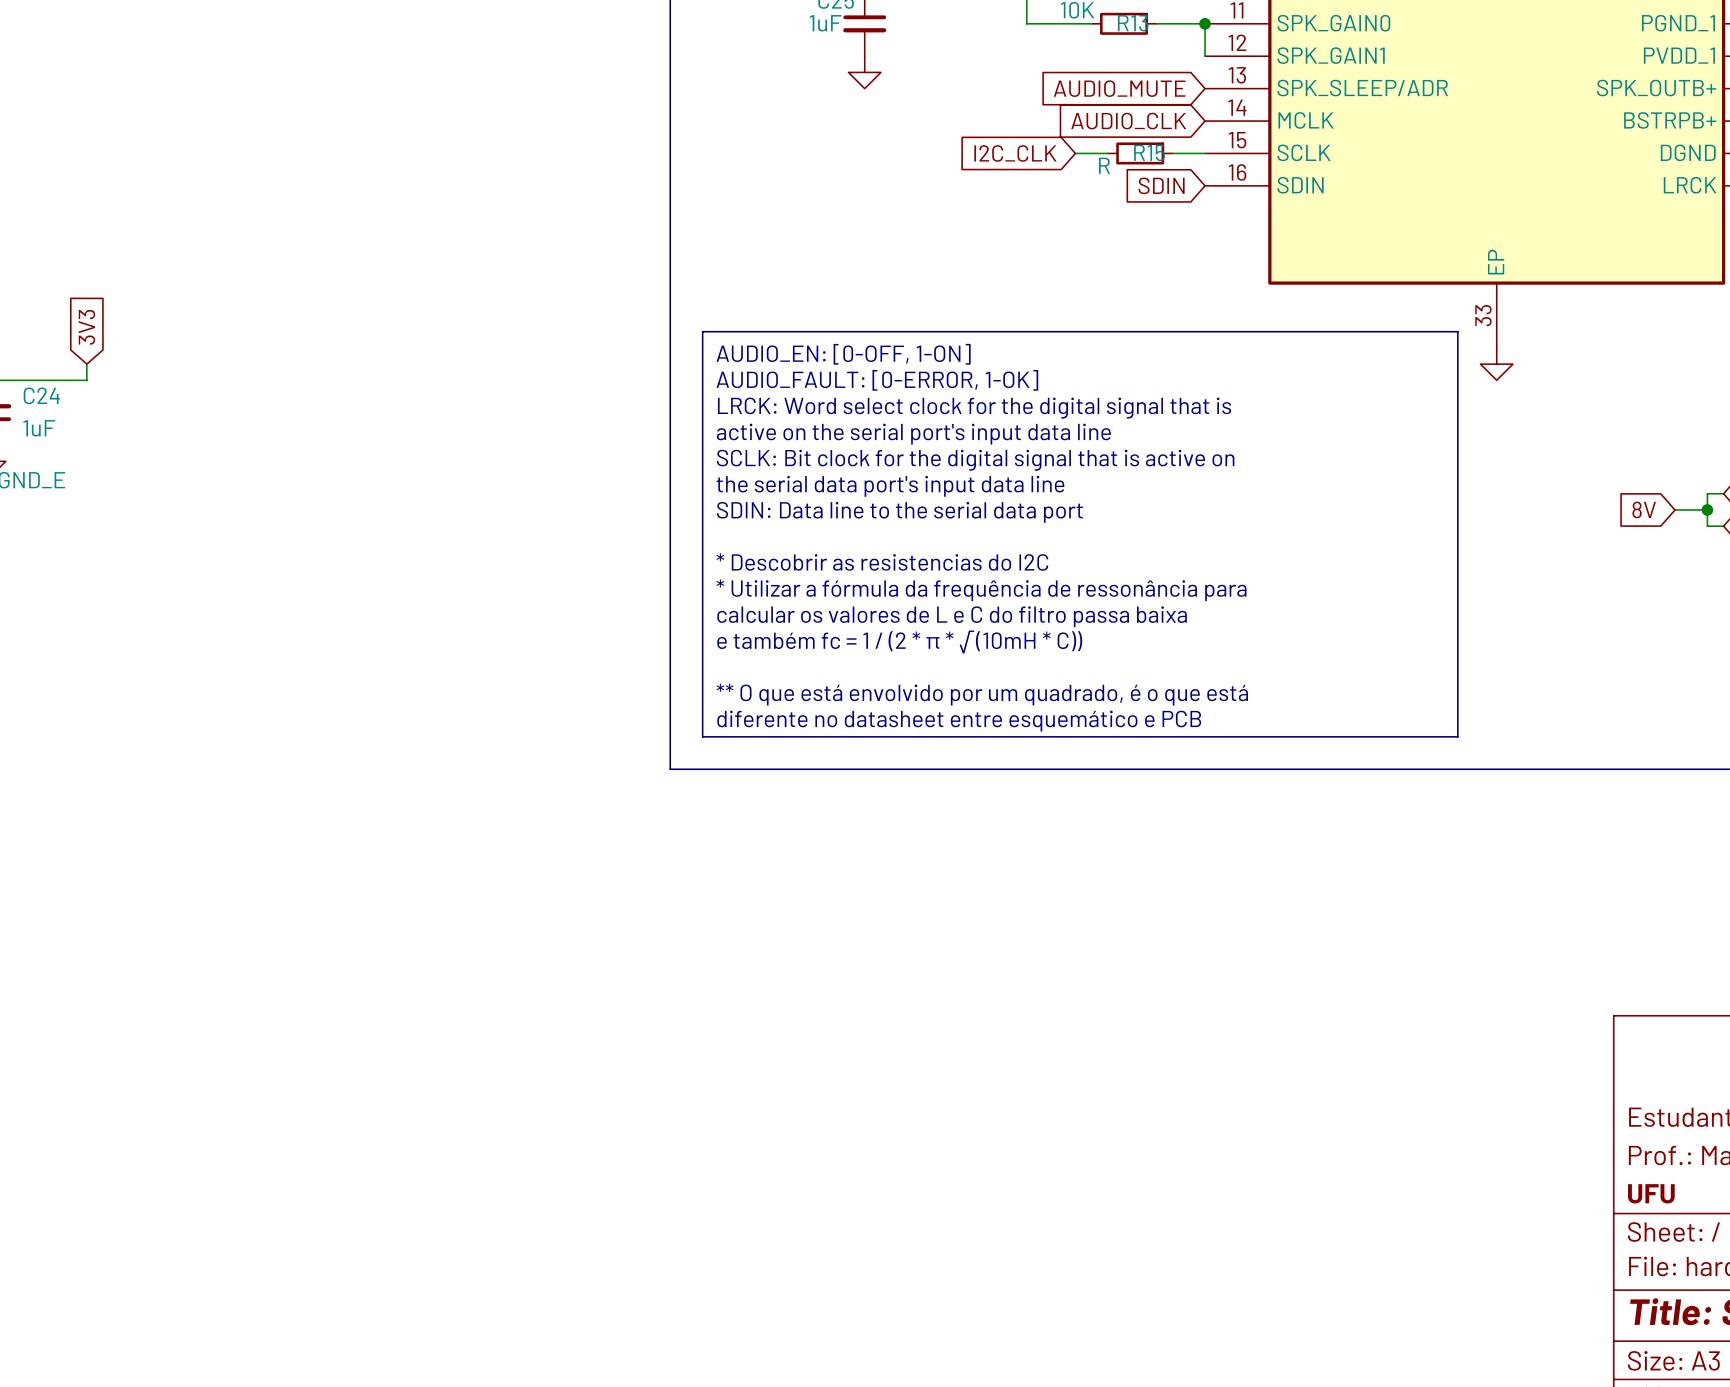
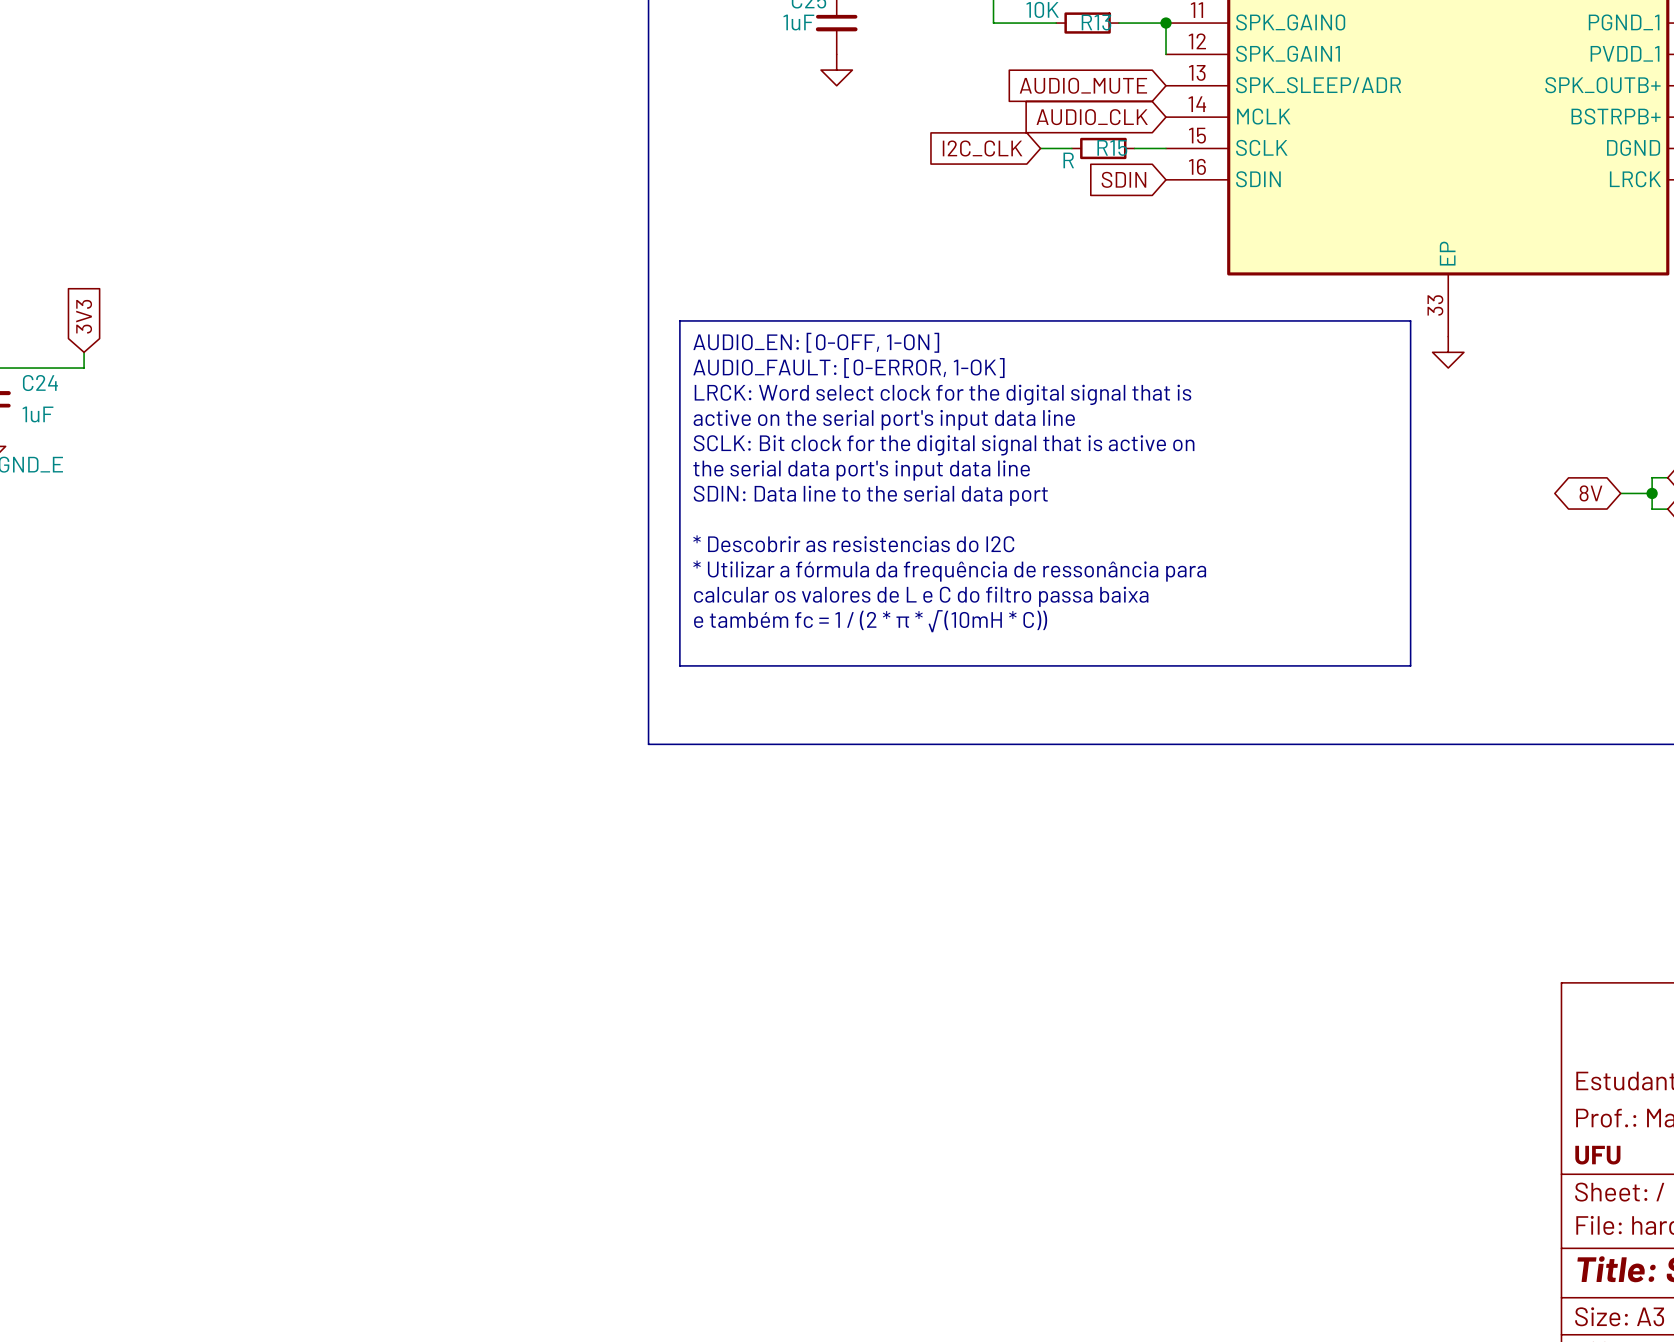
global label shape: input (1644, 509) -> bidirectional (1590, 493)
line: (702, 688) (702, 736) (1457, 736) (1457, 688) -> (679, 665) (1410, 665)
text: ** O que está envolvido por um quadrado, é o que está (982, 694) -> none
text: diferente no datasheet entre esquemático e PCB (959, 721) -> none

